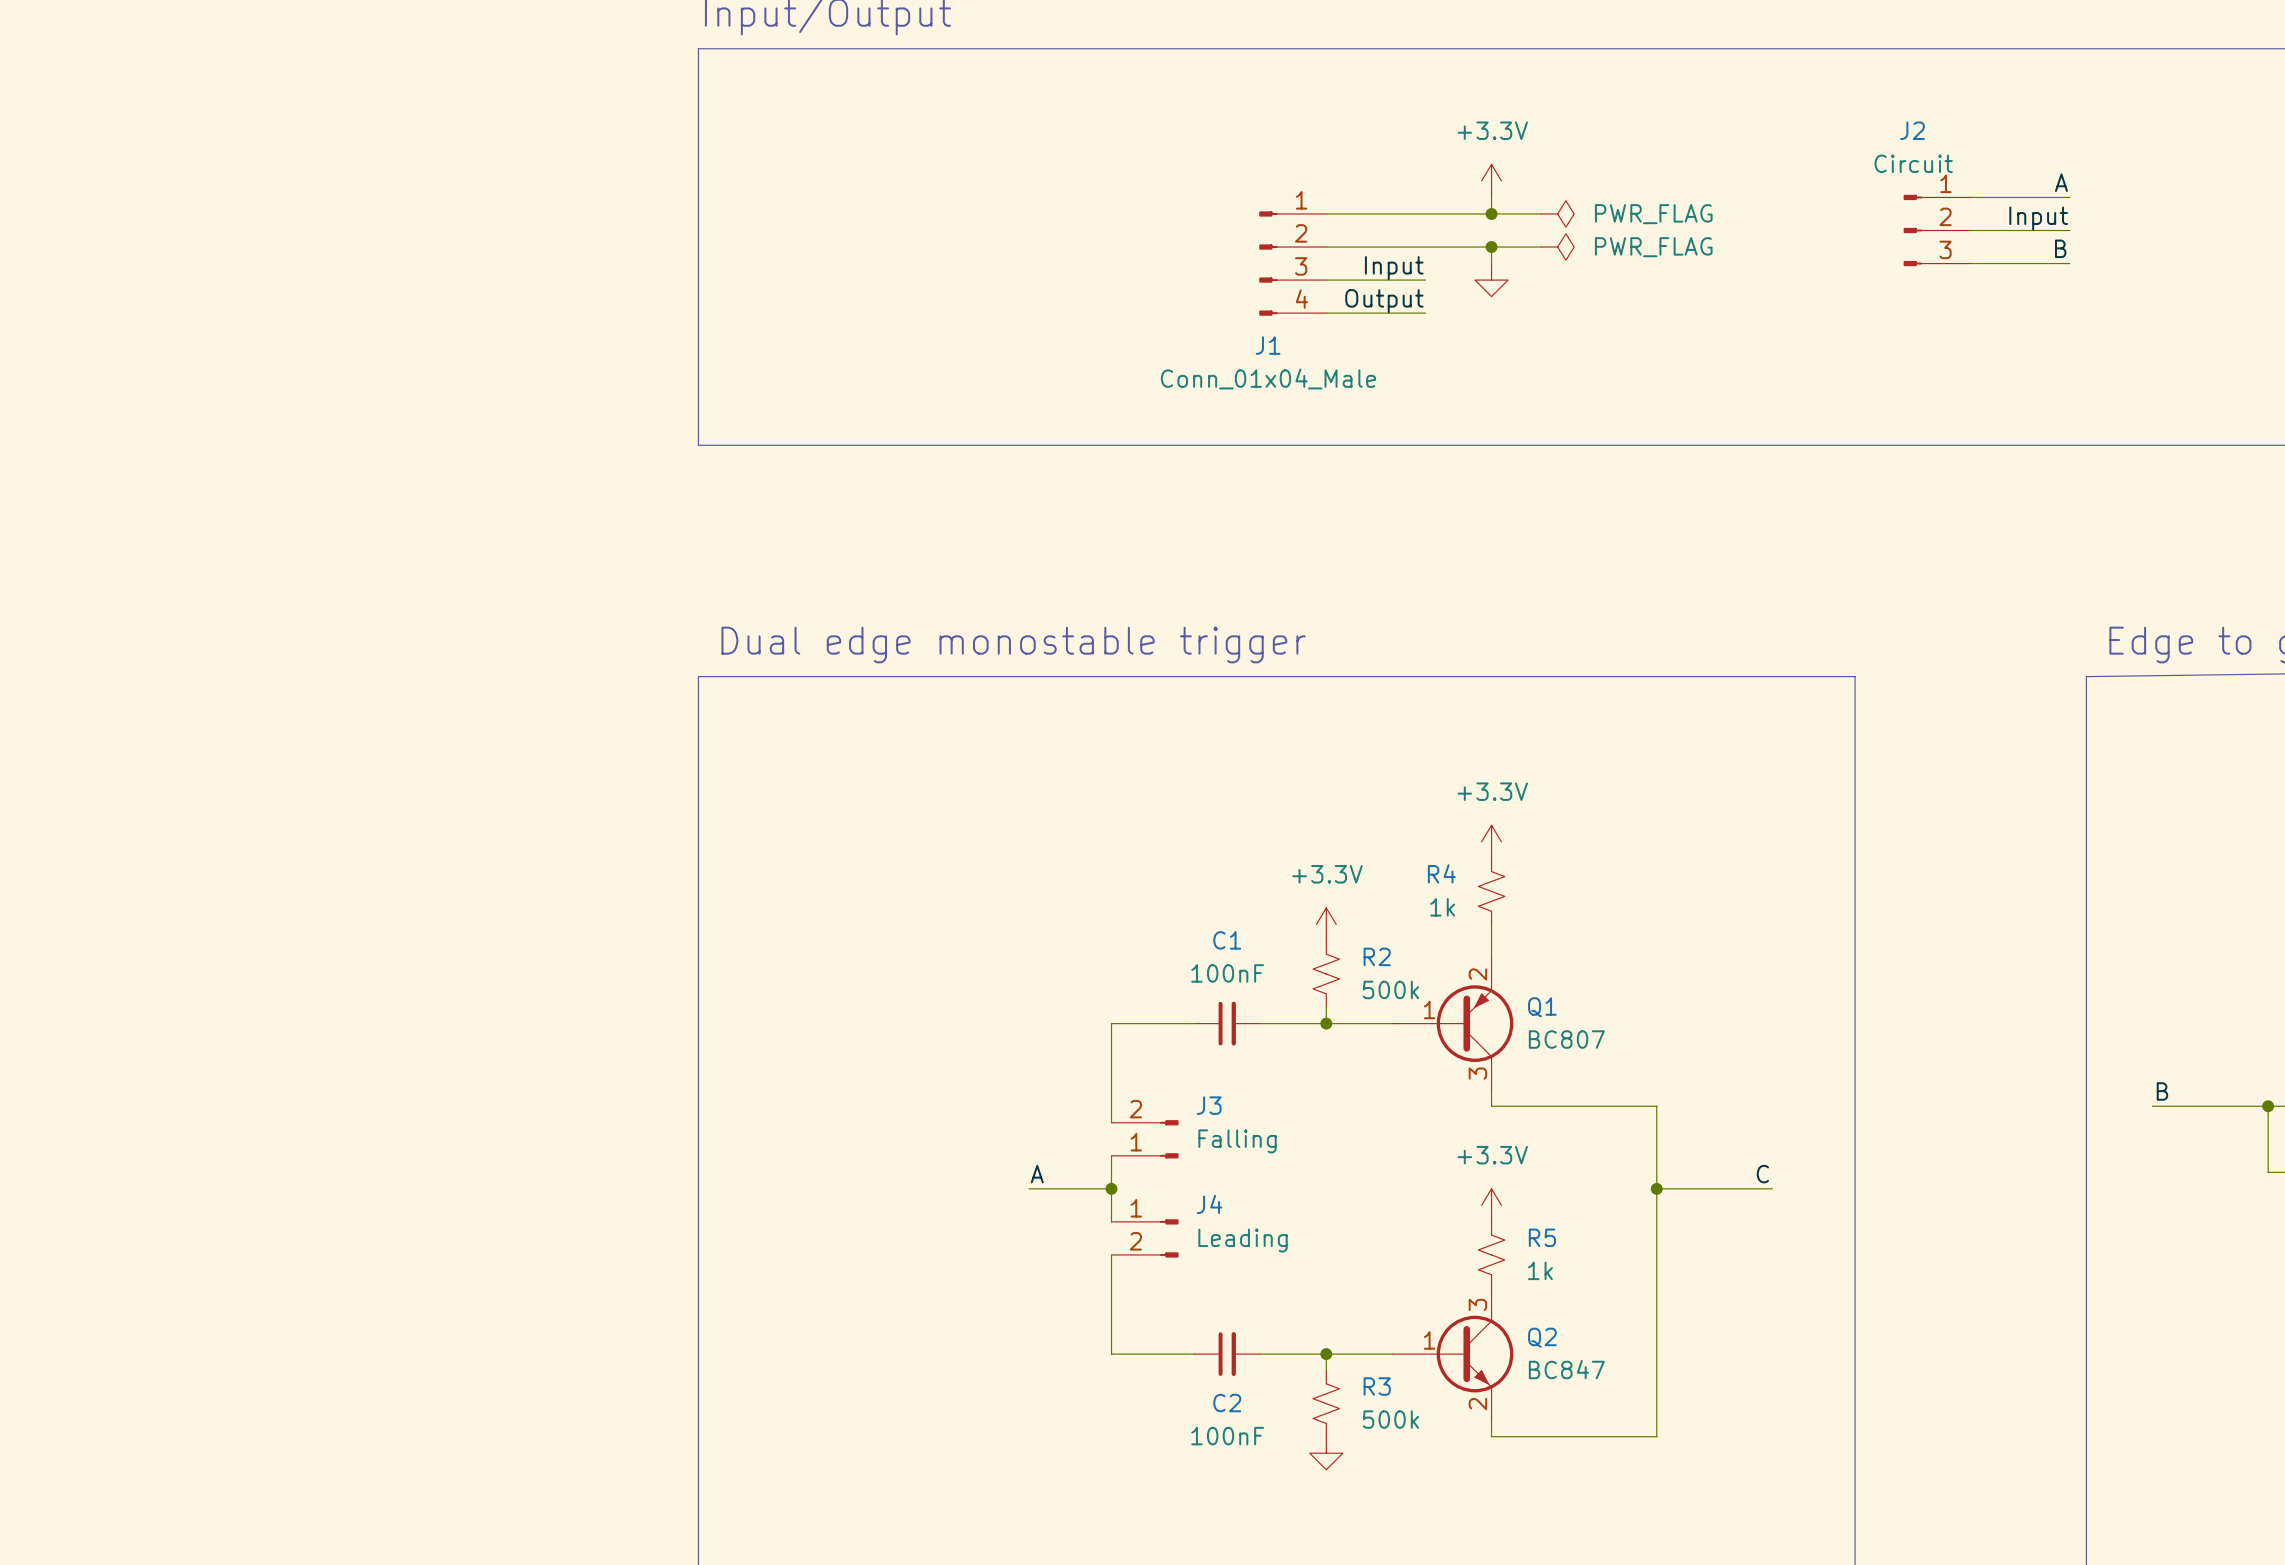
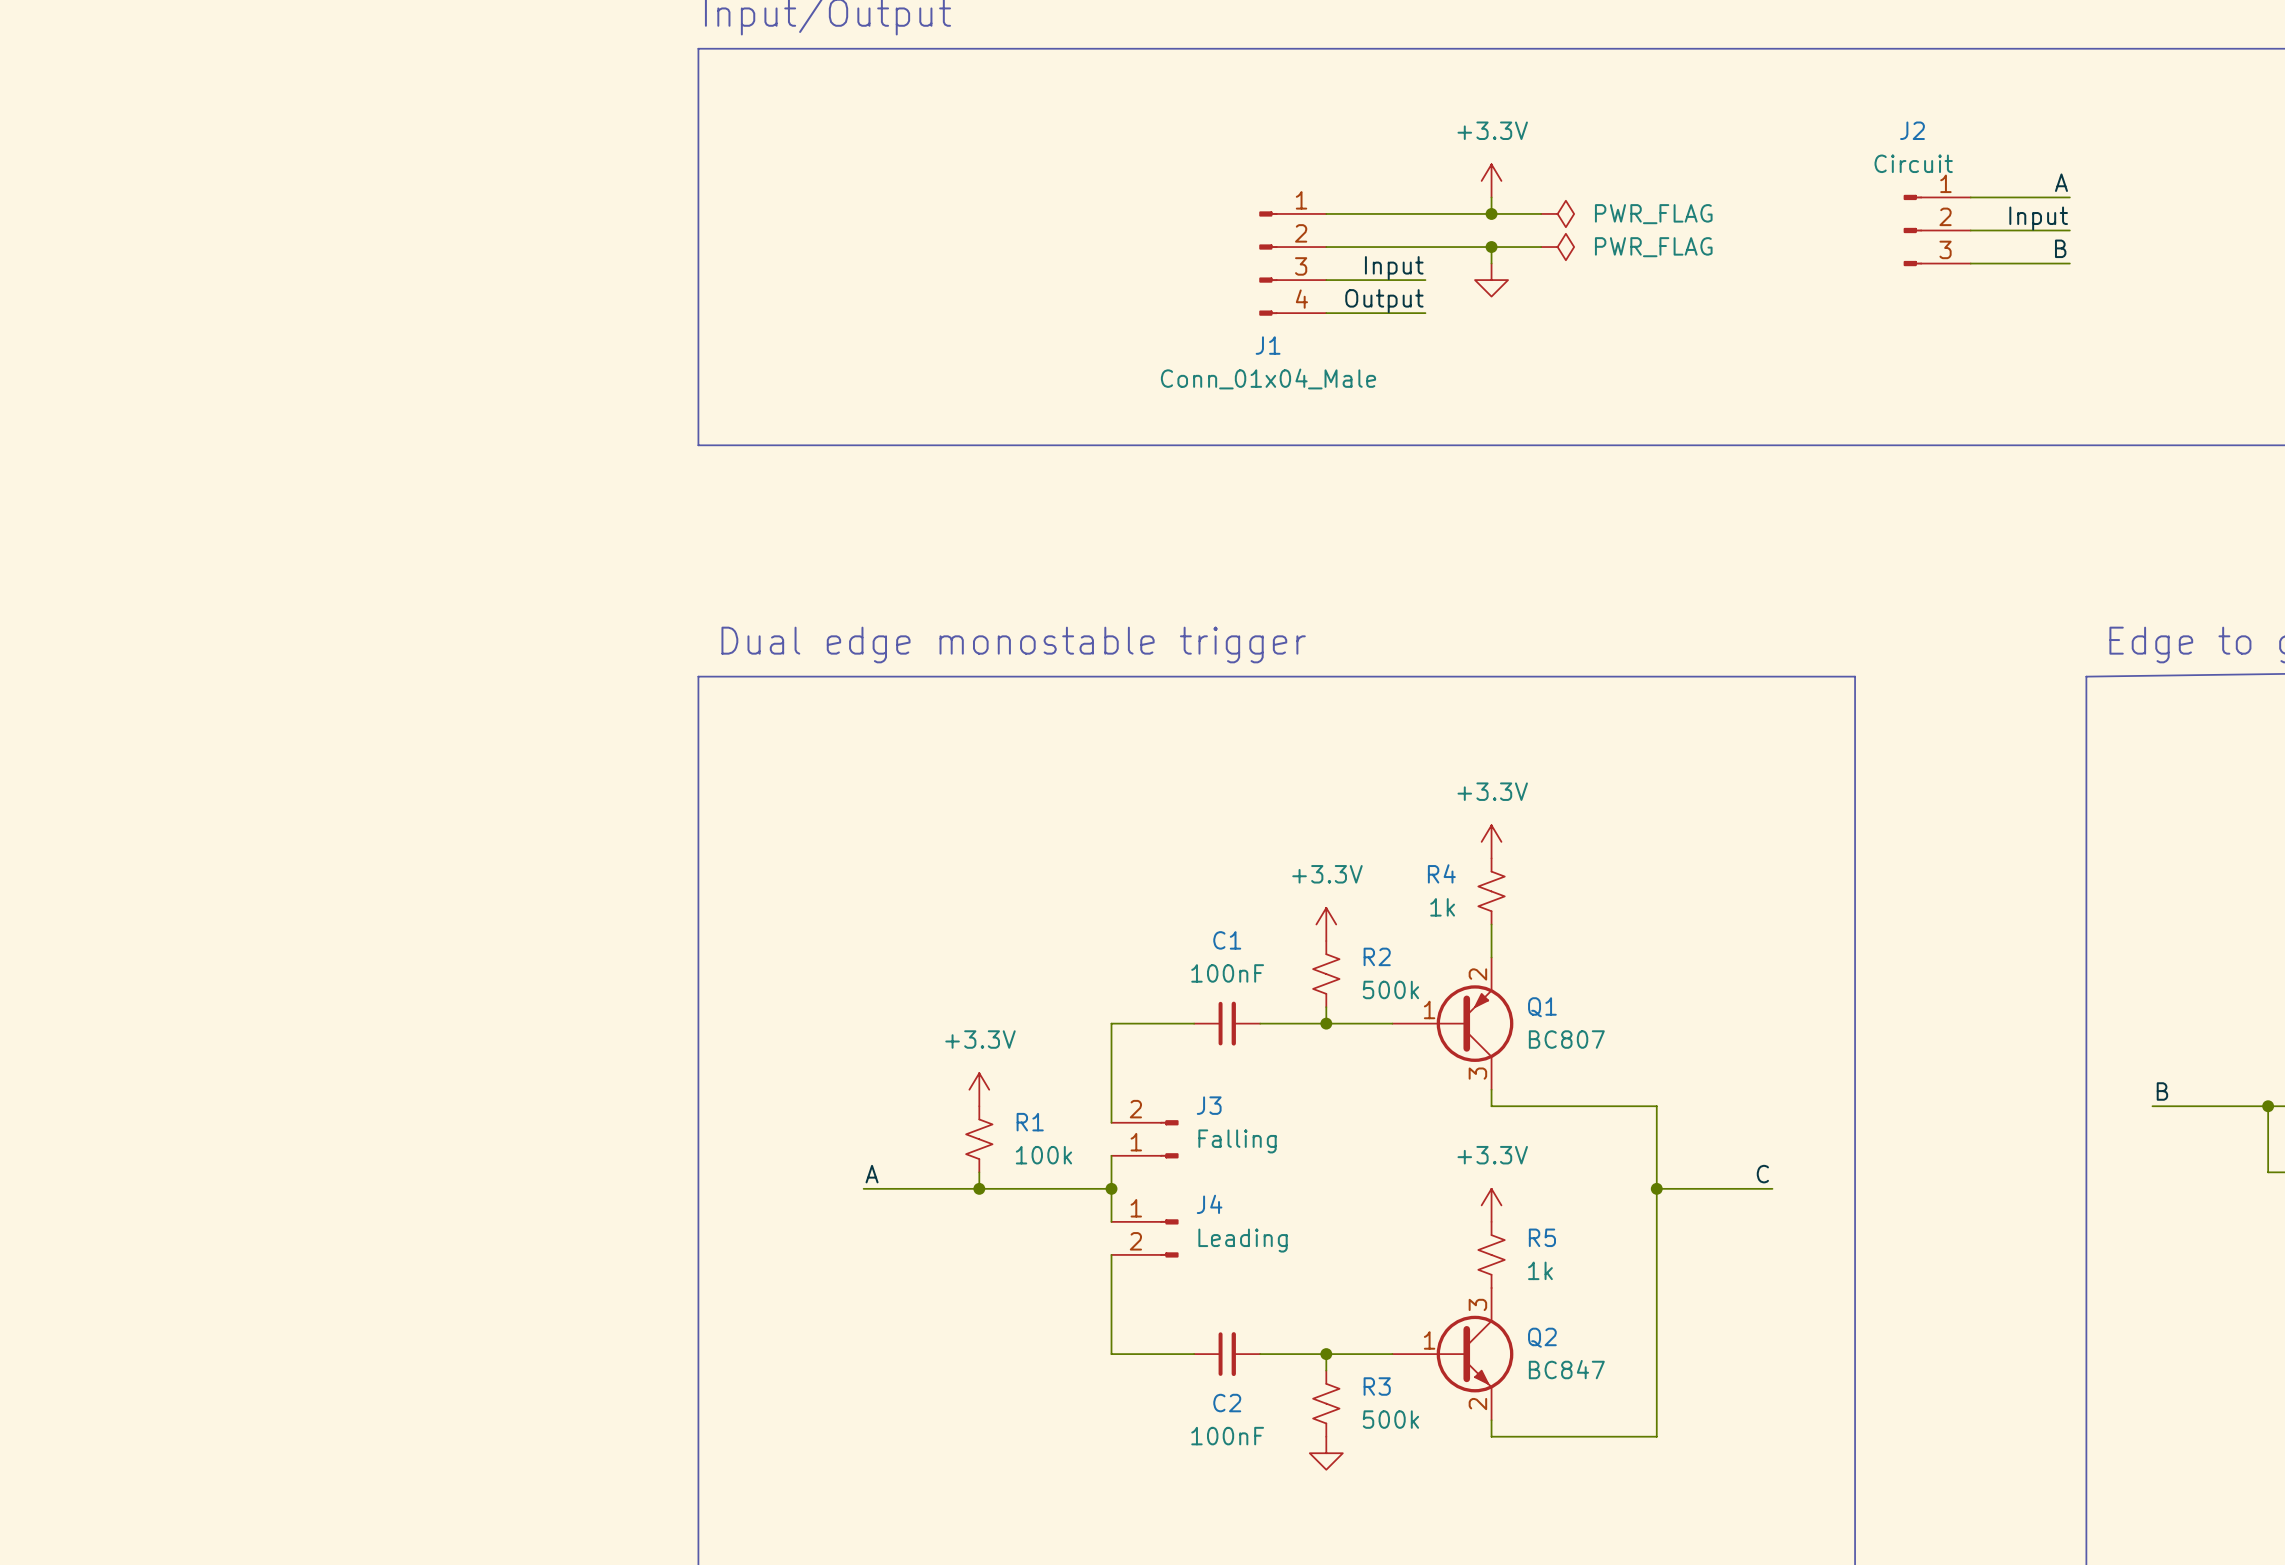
power symbol: none -> +3.3V (979, 1089)
R1: none -> 100k (979, 1139)
wire: none -> (979, 1172) (979, 1188)
label position: A (1037, 1174) -> A (872, 1174)
wire: none -> (863, 1188) (1028, 1188)
junction: none -> (979, 1188)

